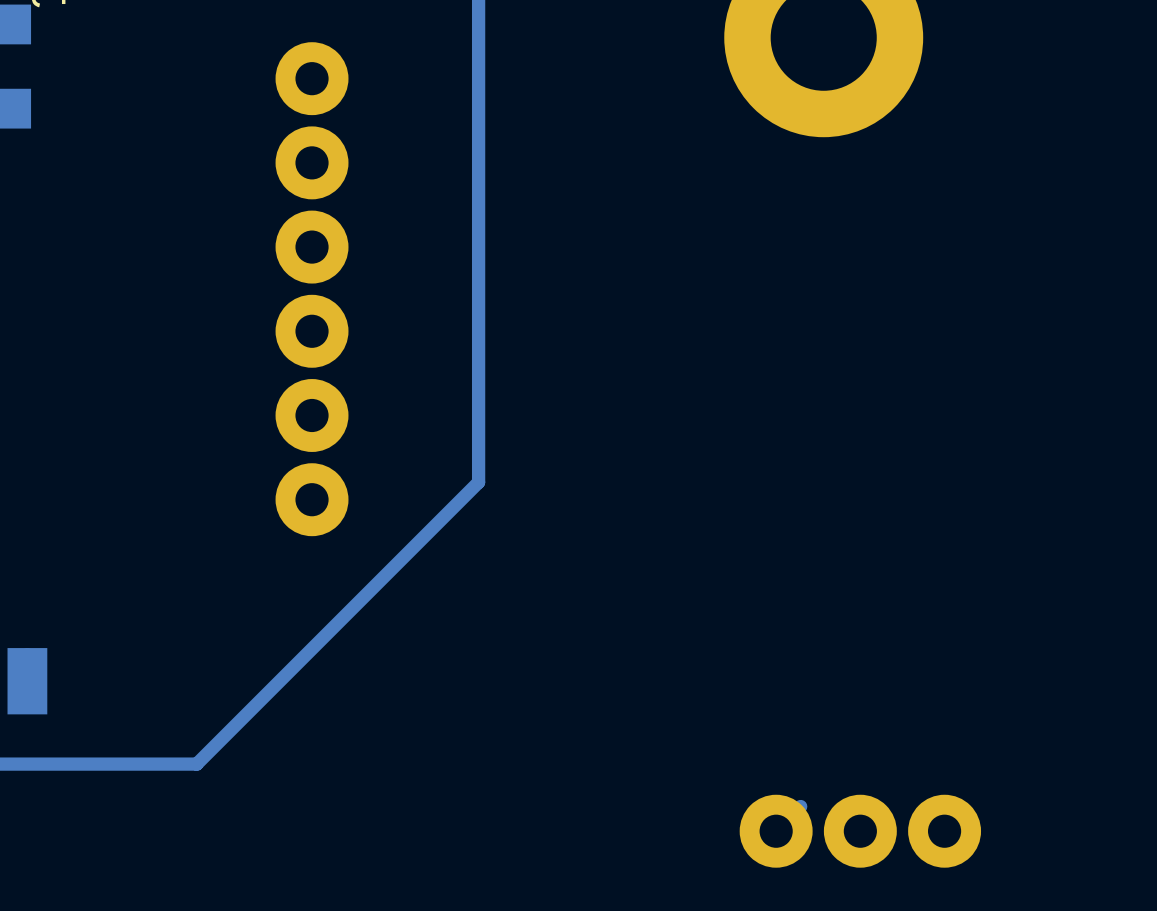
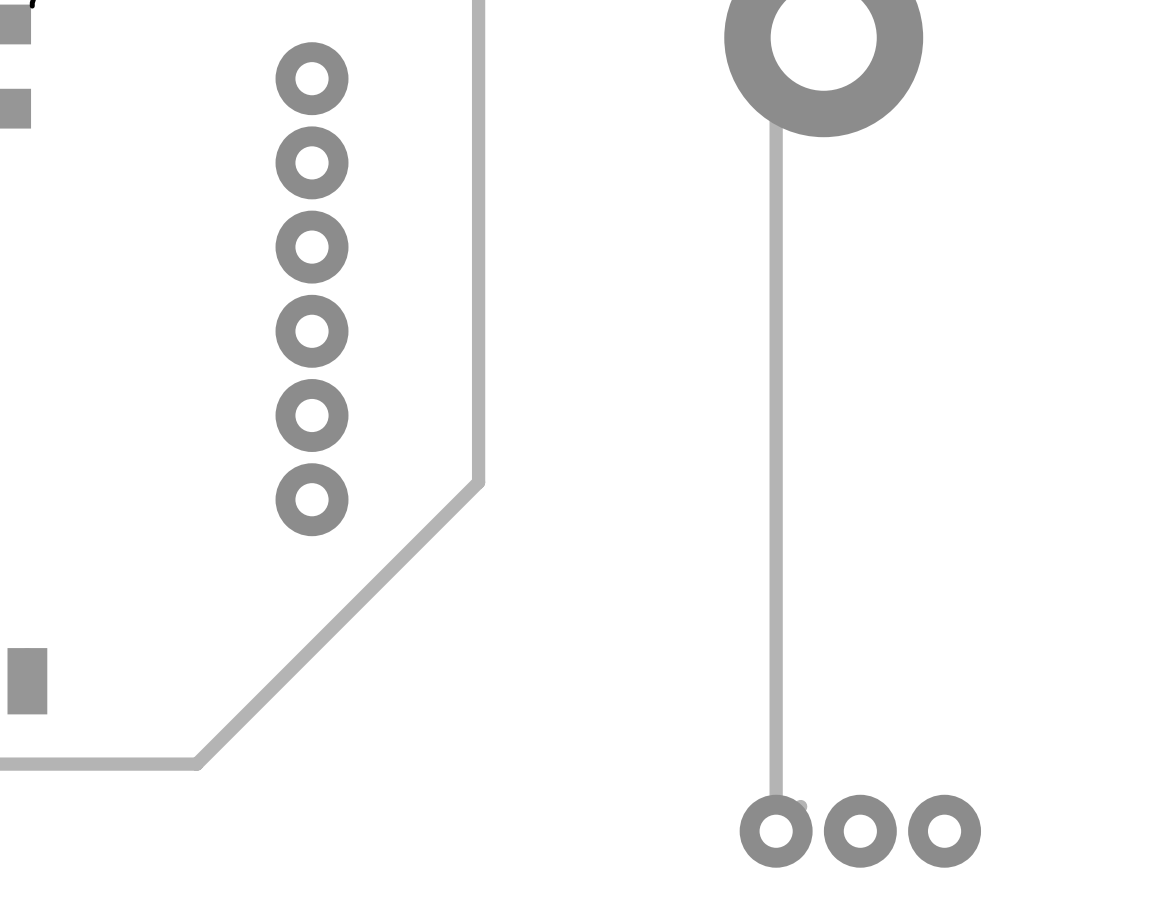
track: none -> (776, 85) (776, 831)

